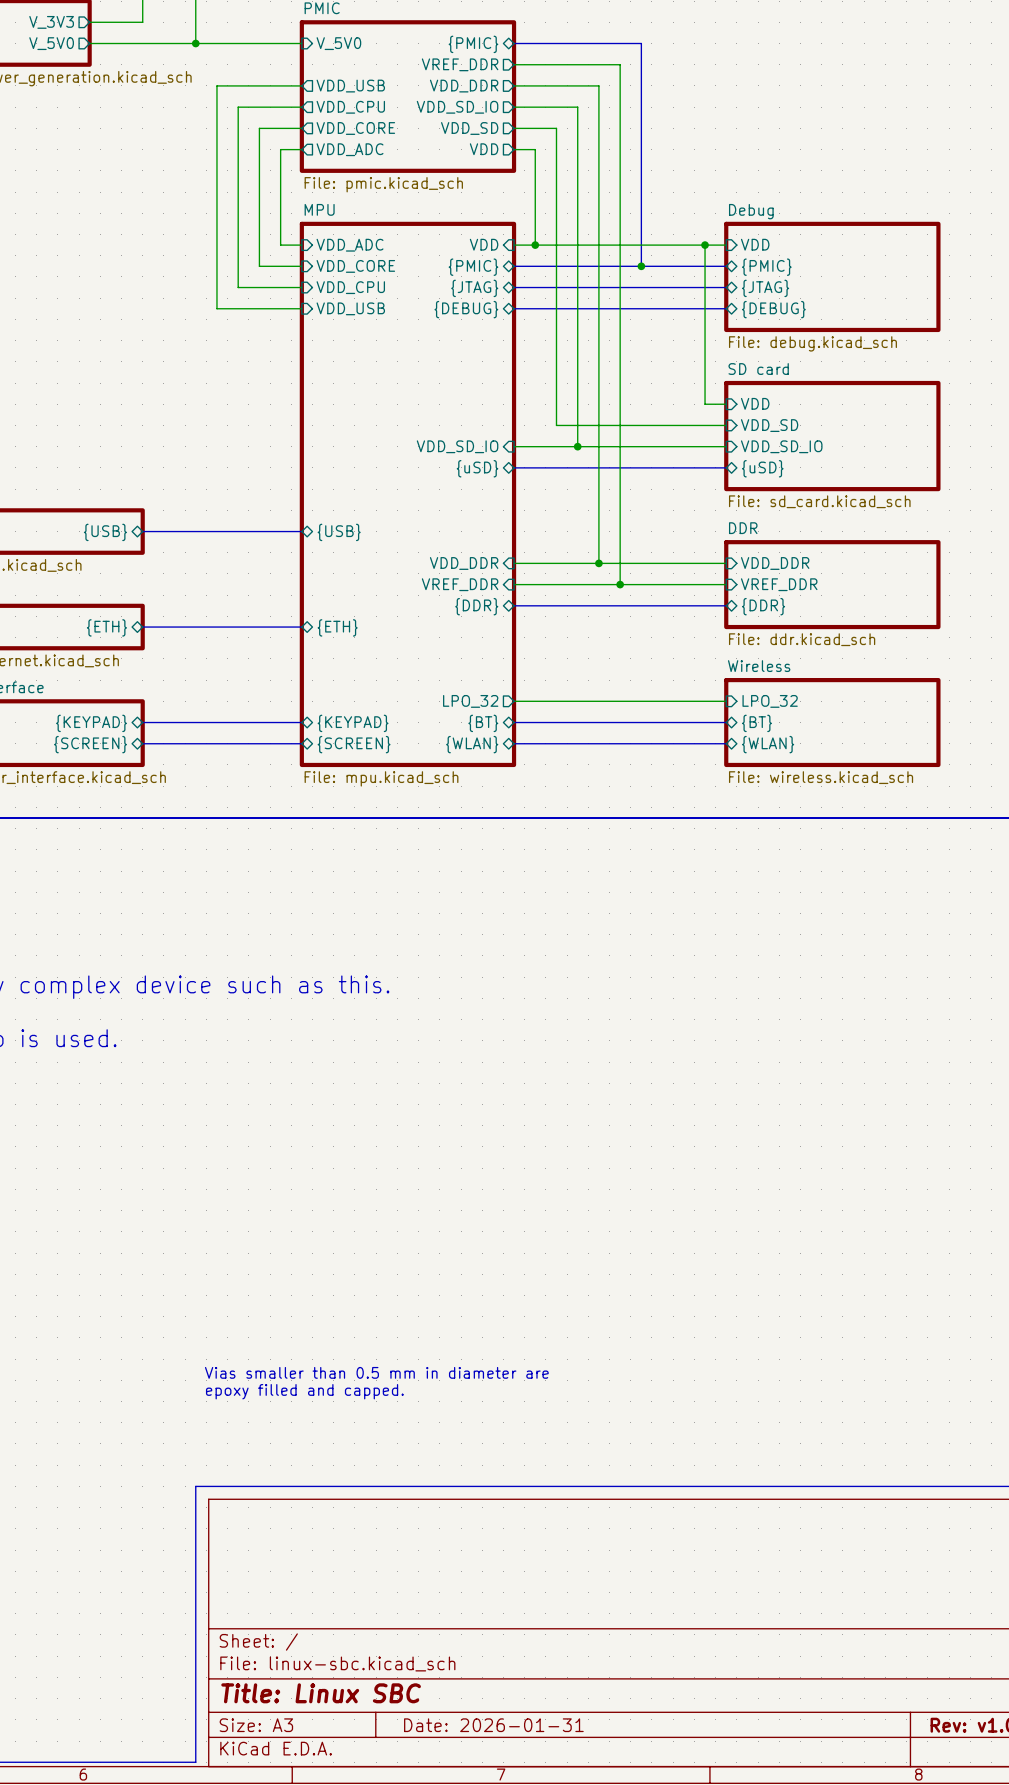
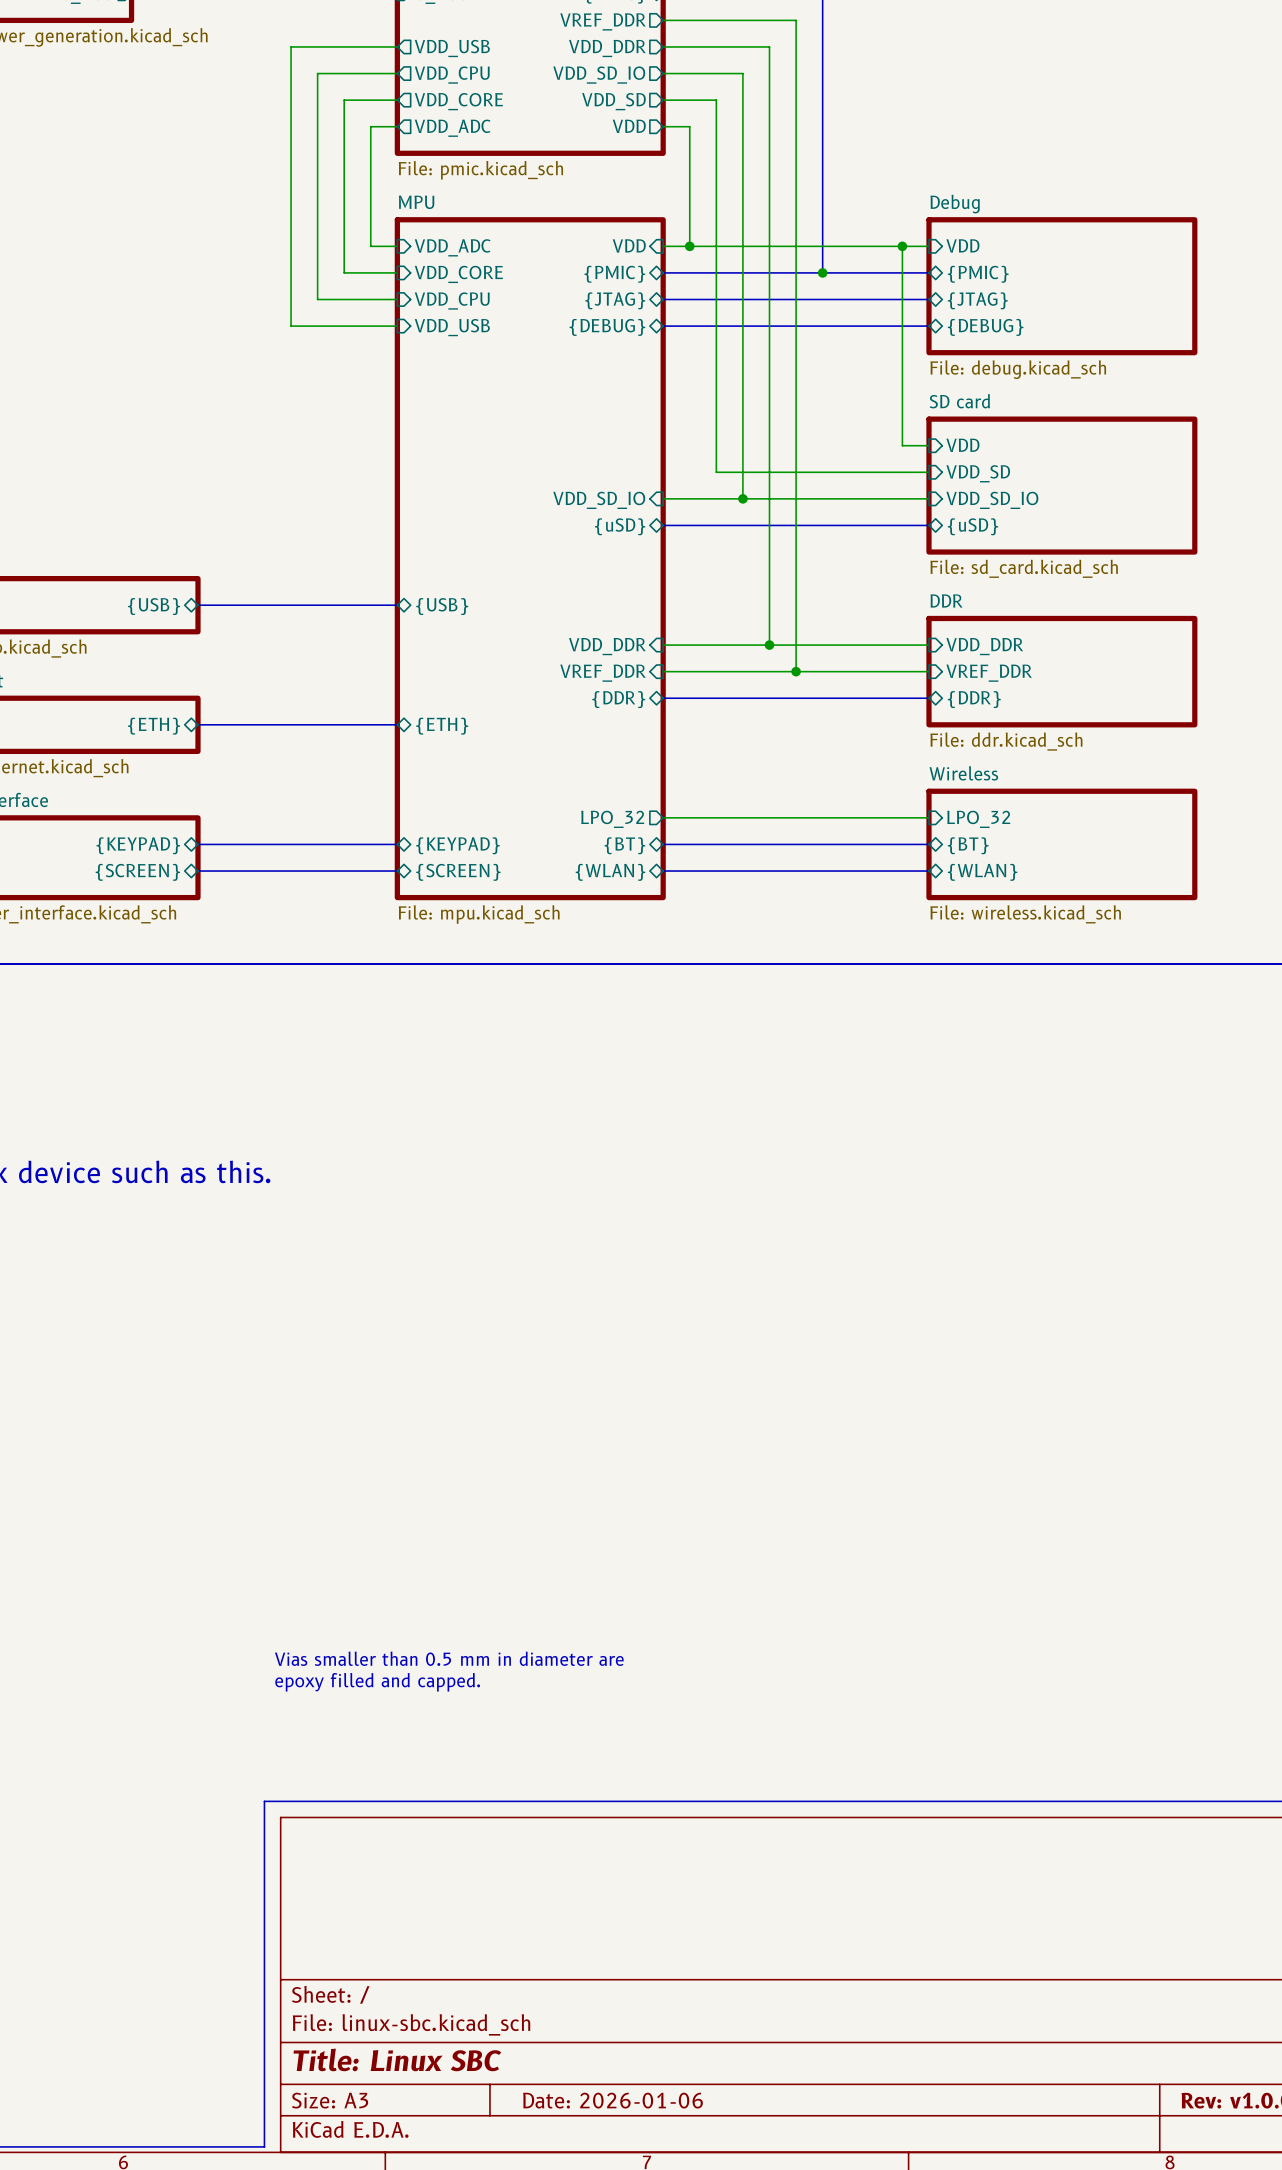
title block: Date: 2026-01-31 (493, 1725) -> Date: 2026-01-06 (613, 2100)

